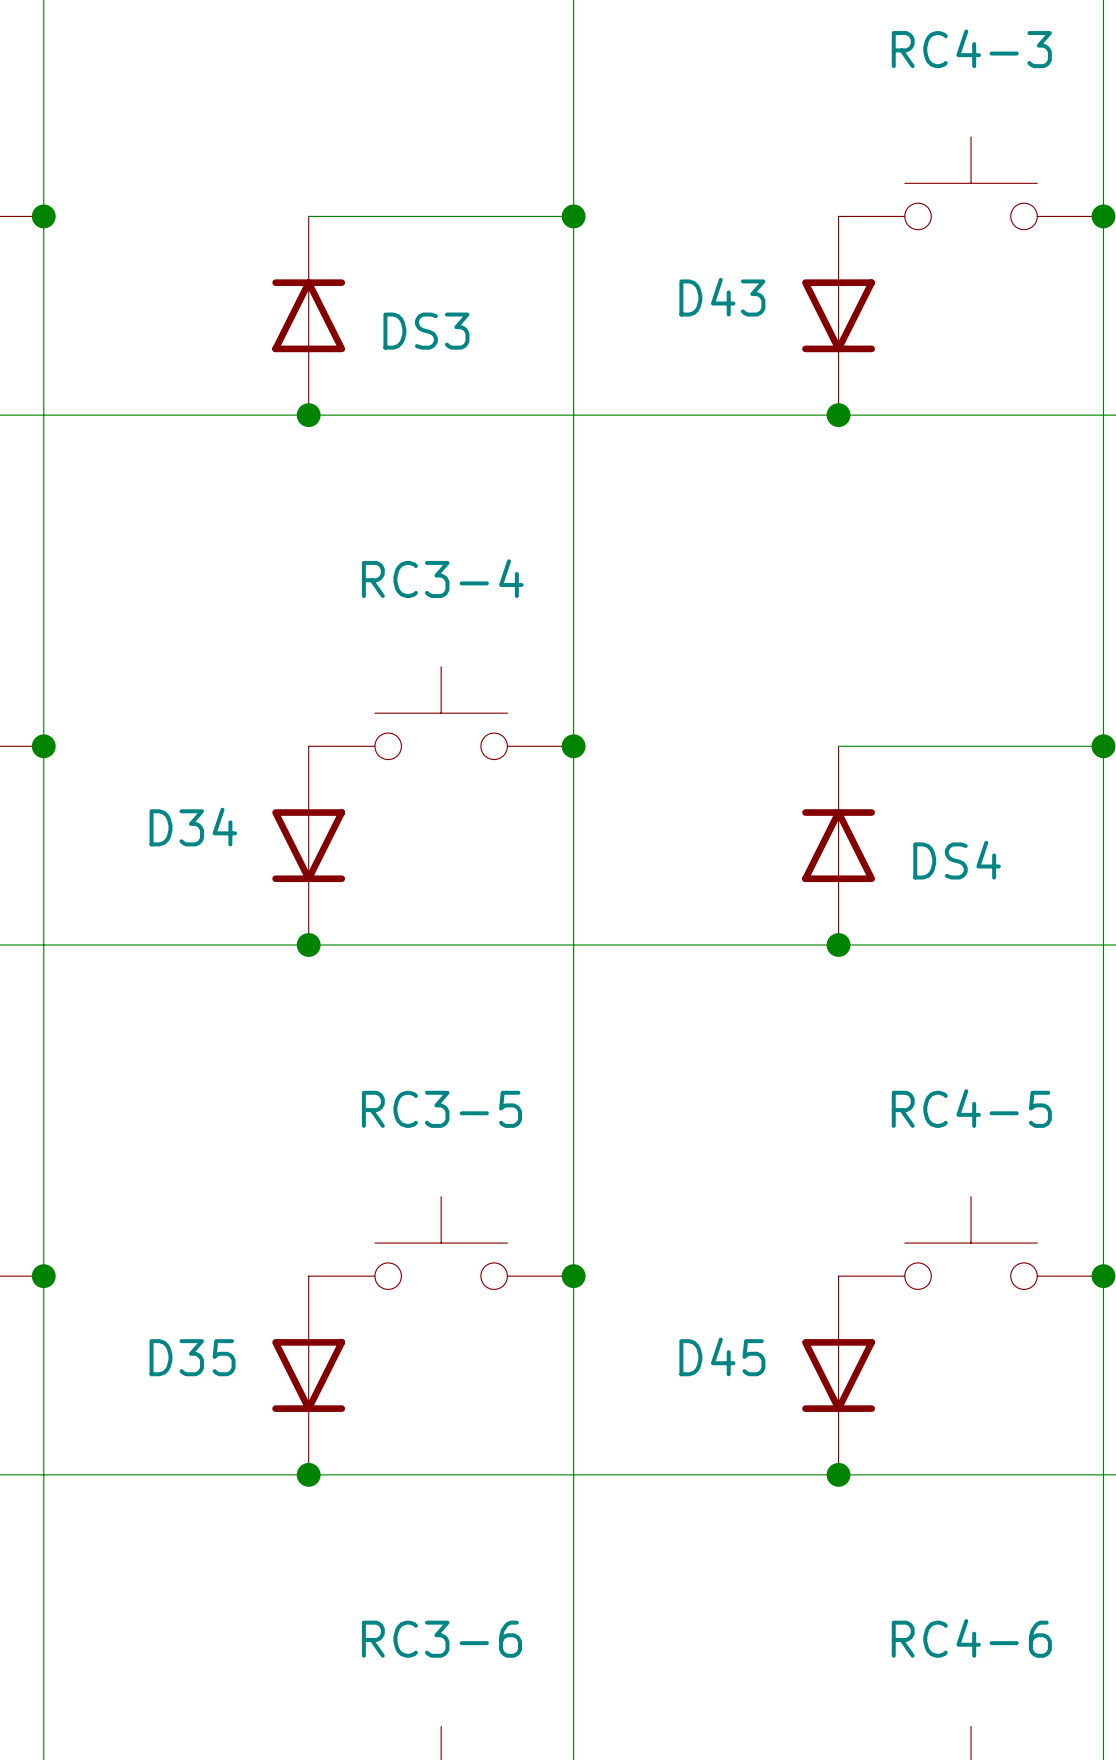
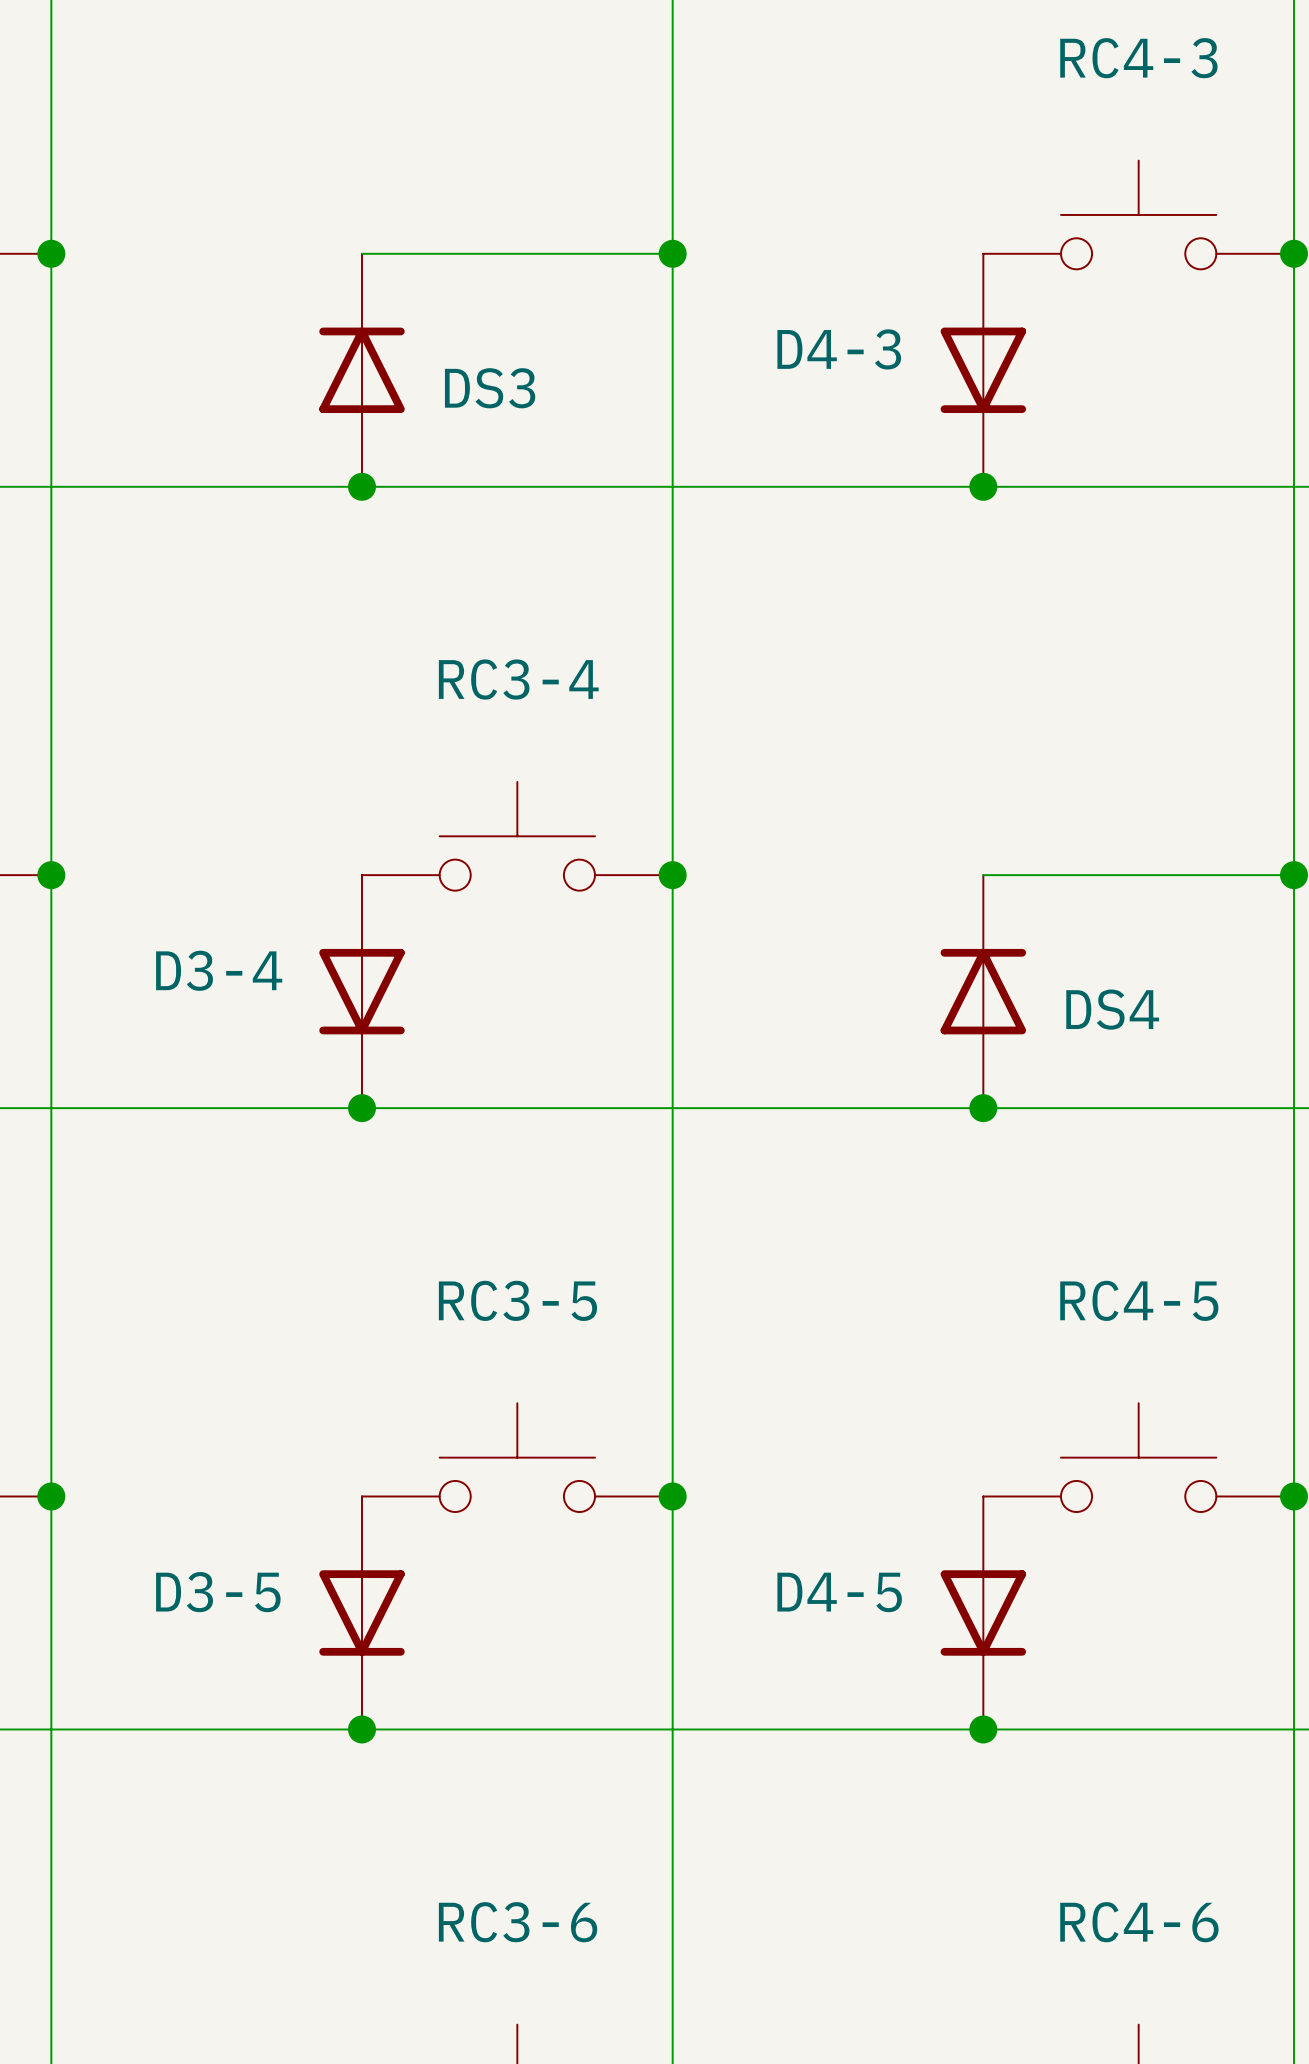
D43 name: D43 (722, 297) -> D4-3 (839, 349)
D34 name: D34 (193, 827) -> D3-4 (219, 970)
D45 name: D45 (722, 1356) -> D4-5 (839, 1592)
D35 name: D35 (192, 1357) -> D3-5 (218, 1592)

